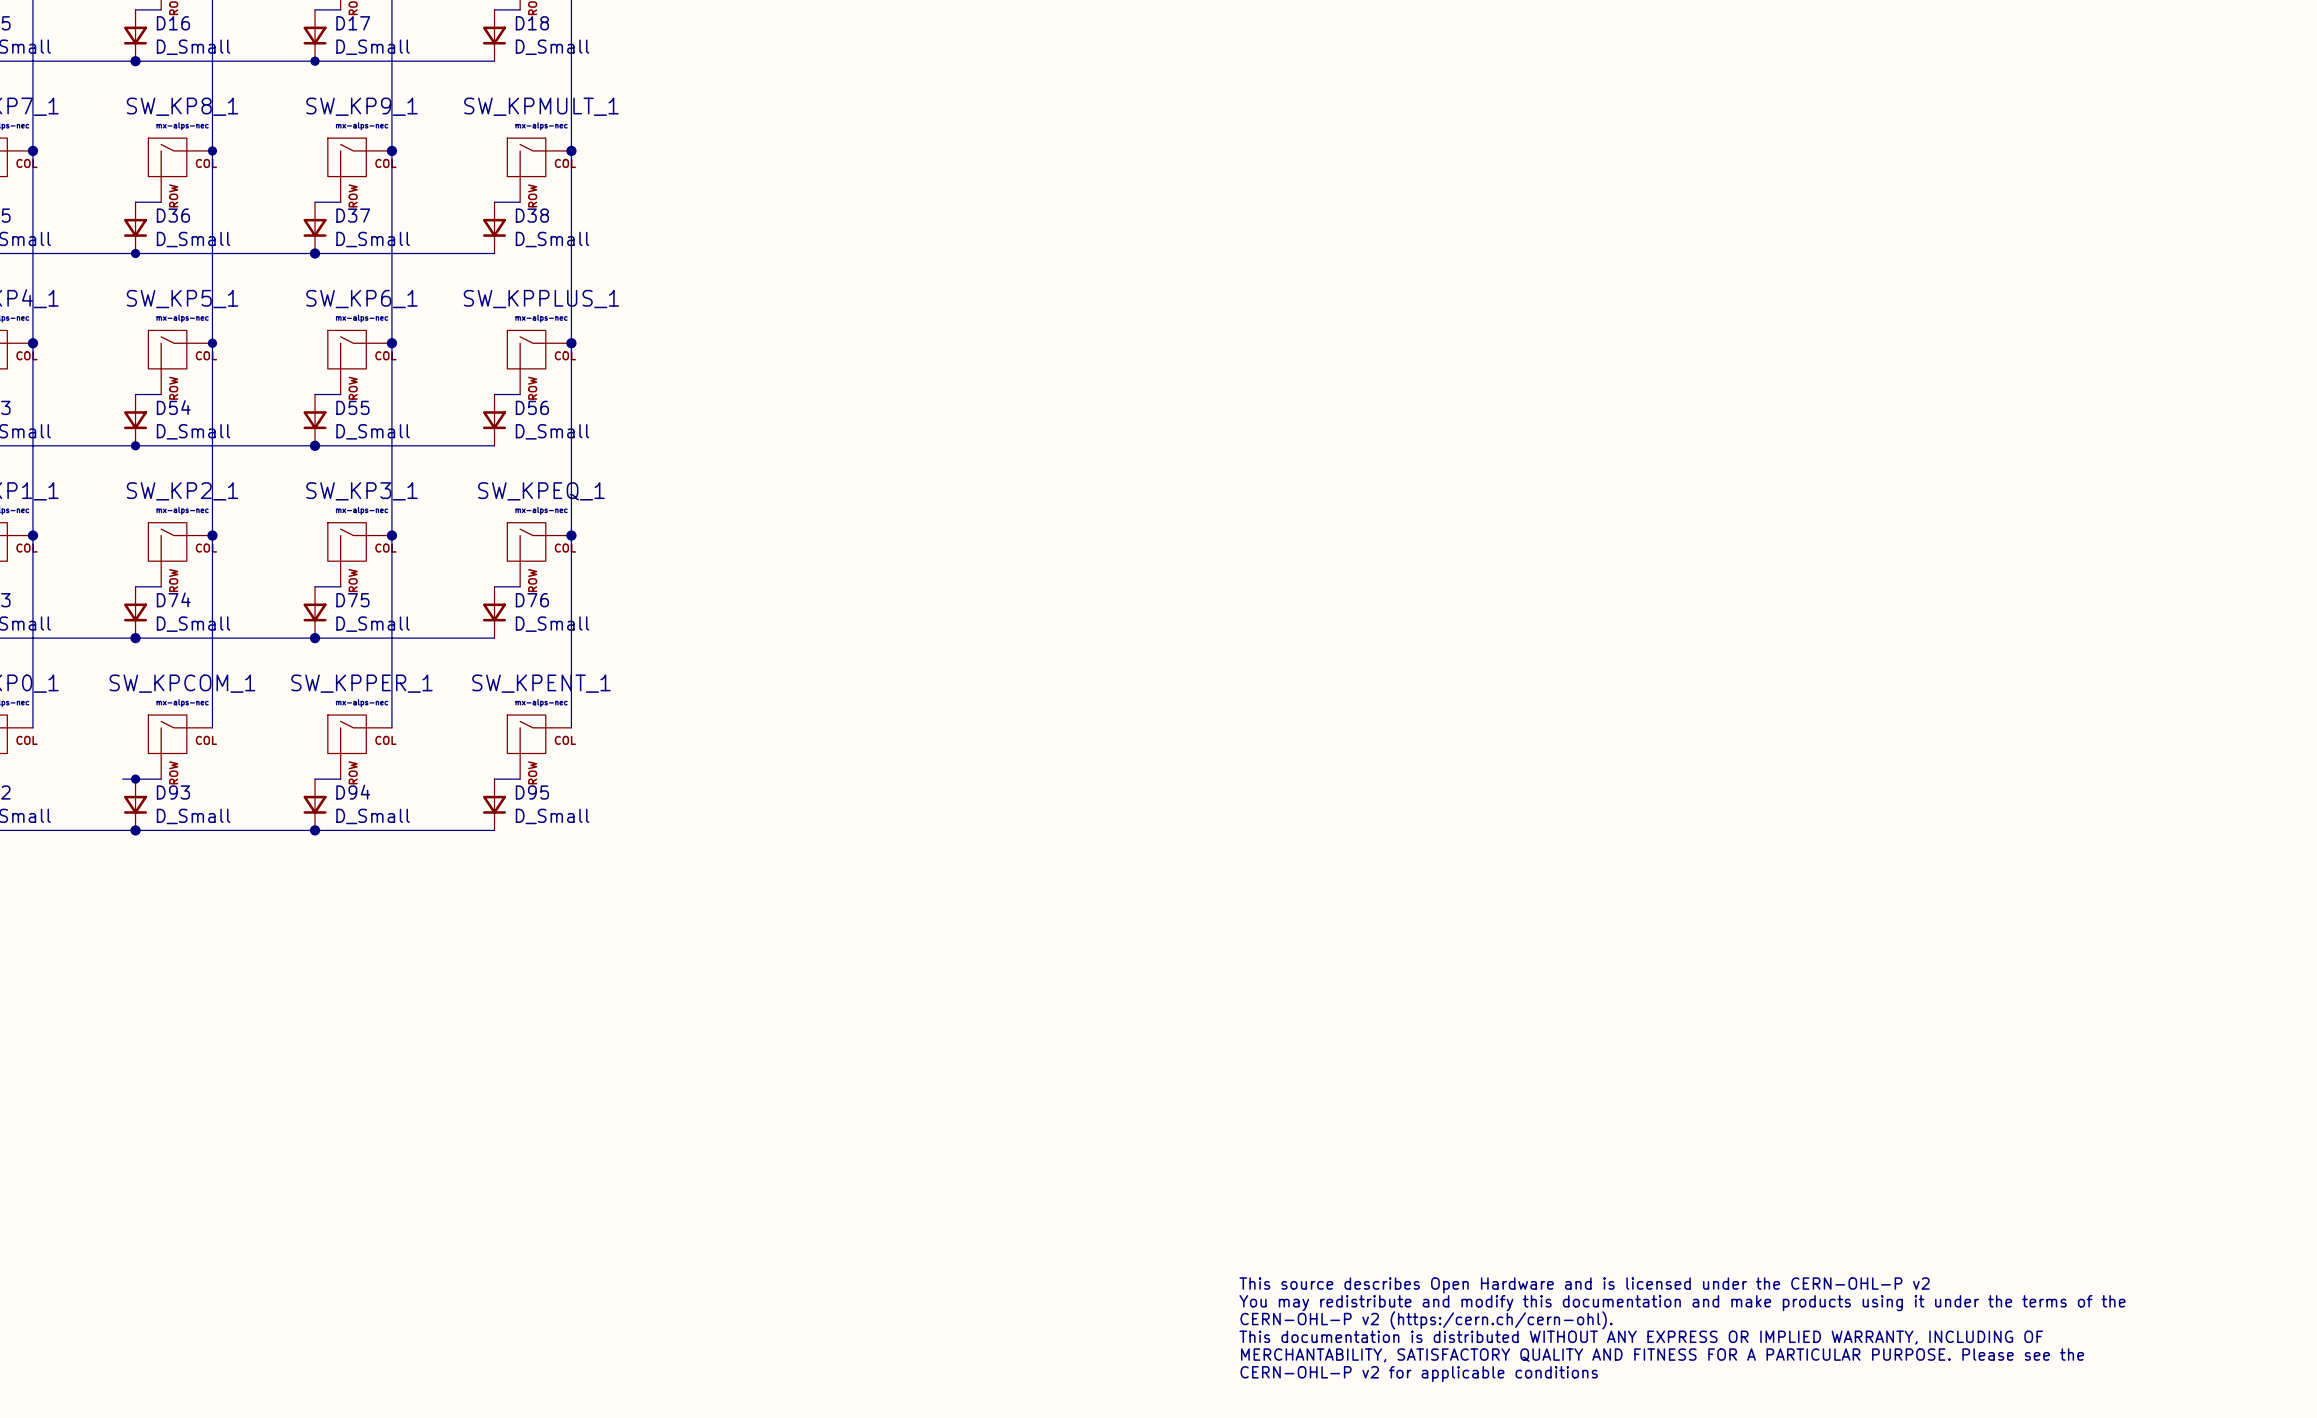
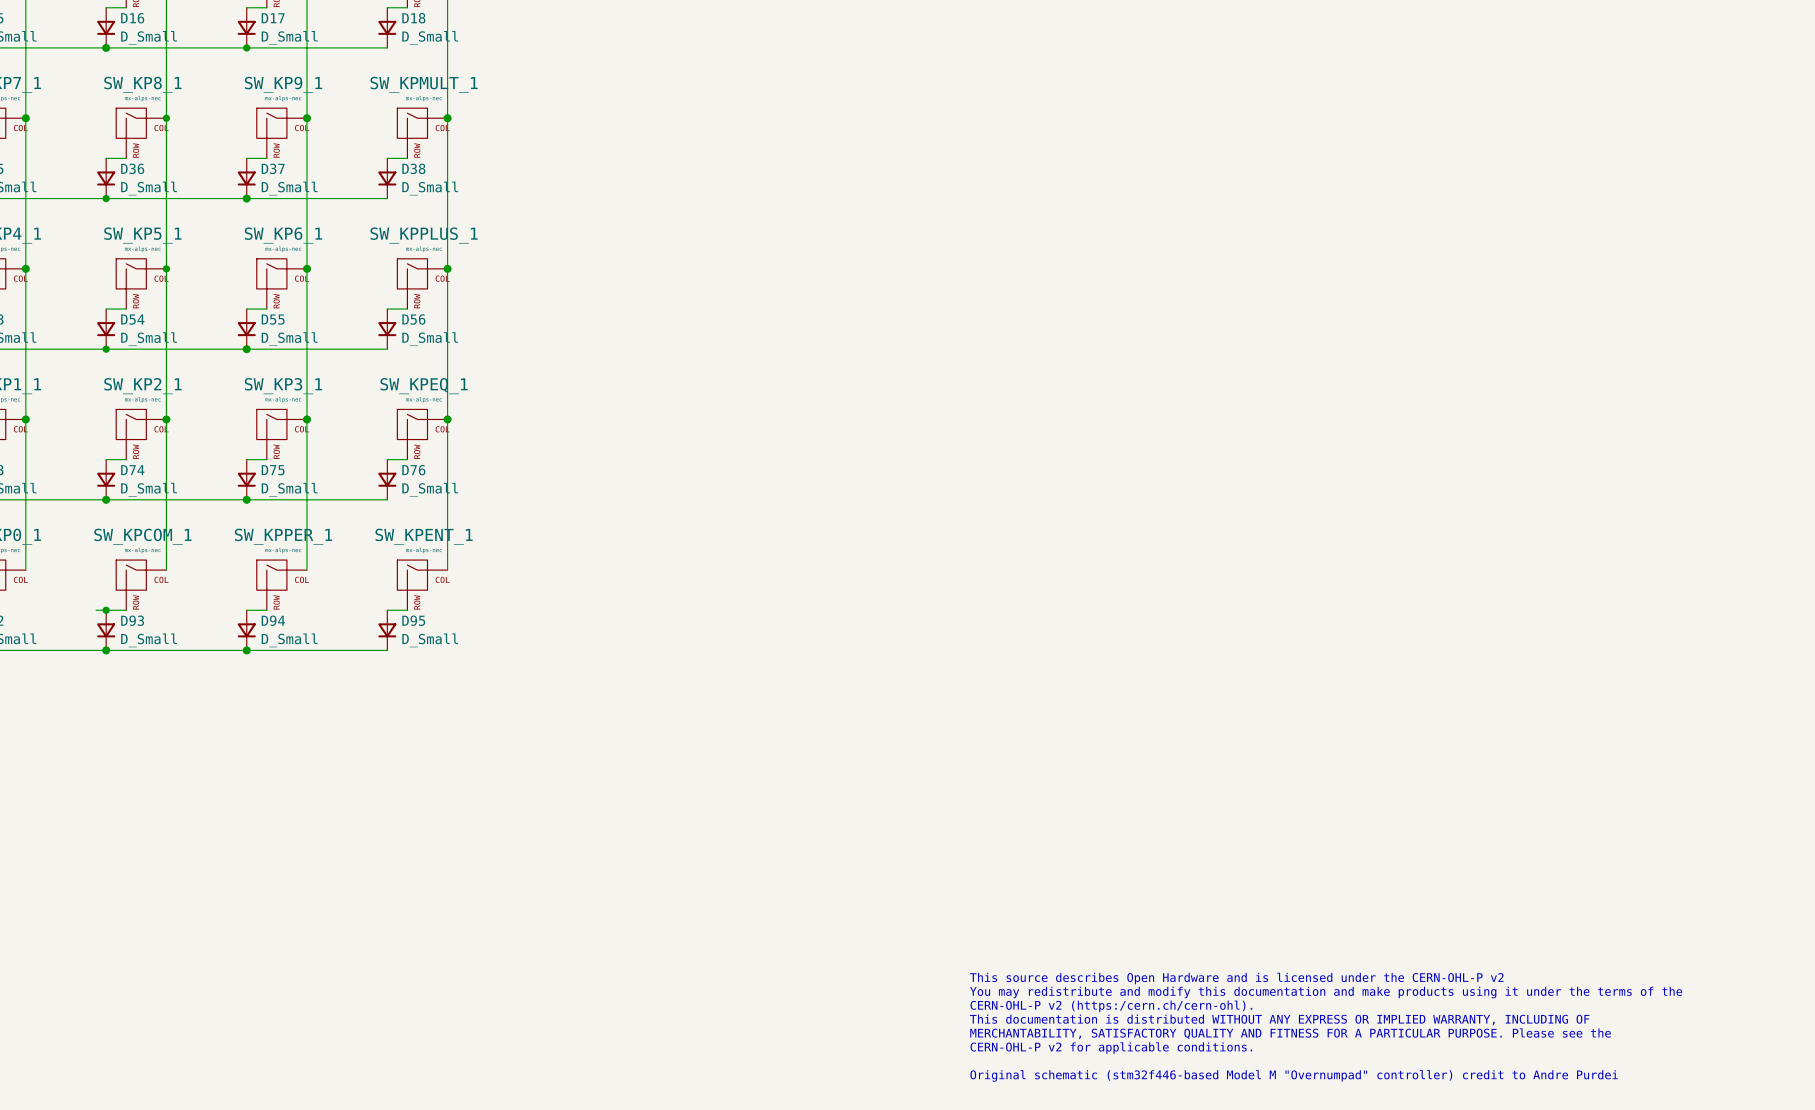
text: none -> This source describes Open Hardware and is licensed under the CERN-OHL-P v2 (1236, 978)
text: none -> You may redistribute and modify this documentation and make products using it under the terms of the (1326, 992)
text: This source describes Open Hardware and is licensed under the CERN-OHL-P v2 (1584, 1285) -> CERN-OHL-P v2 (https:/cern.ch/cern-ohl). (1111, 1006)
text: You may redistribute and modify this documentation and make products using it under the terms of the (1682, 1303) -> This documentation is distributed WITHOUT ANY EXPRESS OR IMPLIED WARRANTY, INCLUDING OF (1279, 1019)
text: CERN-OHL-P v2 (https:/cern.ch/cern-ohl). (1426, 1320) -> MERCHANTABILITY, SATISFACTORY QUALITY AND FITNESS FOR A PARTICULAR PURPOSE. Please see the (1290, 1033)
text: This documentation is distributed WITHOUT ANY EXPRESS OR IMPLIED WARRANTY, INCLUDING OF (1641, 1337) -> CERN-OHL-P v2 for applicable conditions. (1111, 1048)
text: MERCHANTABILITY, SATISFACTORY QUALITY AND FITNESS FOR A PARTICULAR PURPOSE. Please see the (1662, 1355) -> none
text: CERN-OHL-P v2 for applicable conditions (1419, 1374) -> Original schematic (stm32f446-based Model M "Overnumpad" controller) credit to Andre Purdei (1294, 1075)

